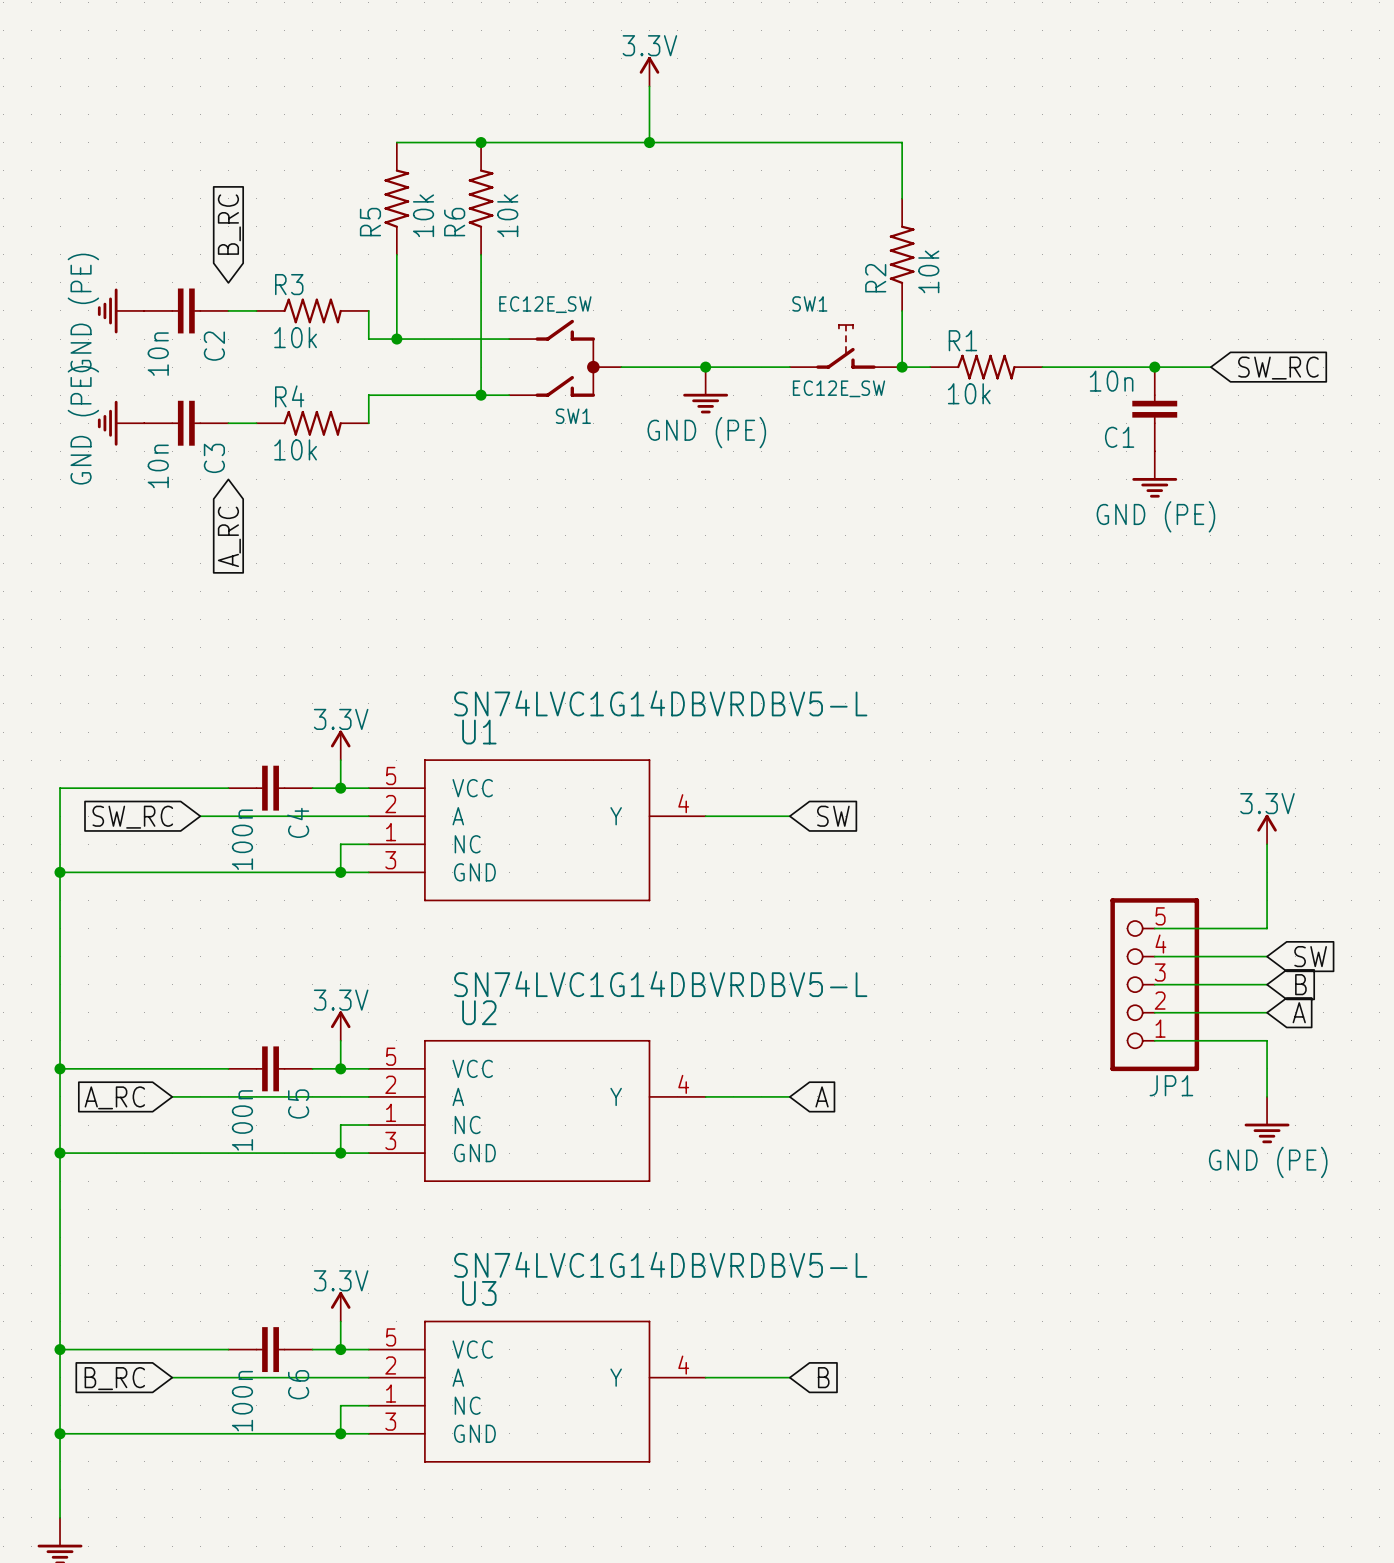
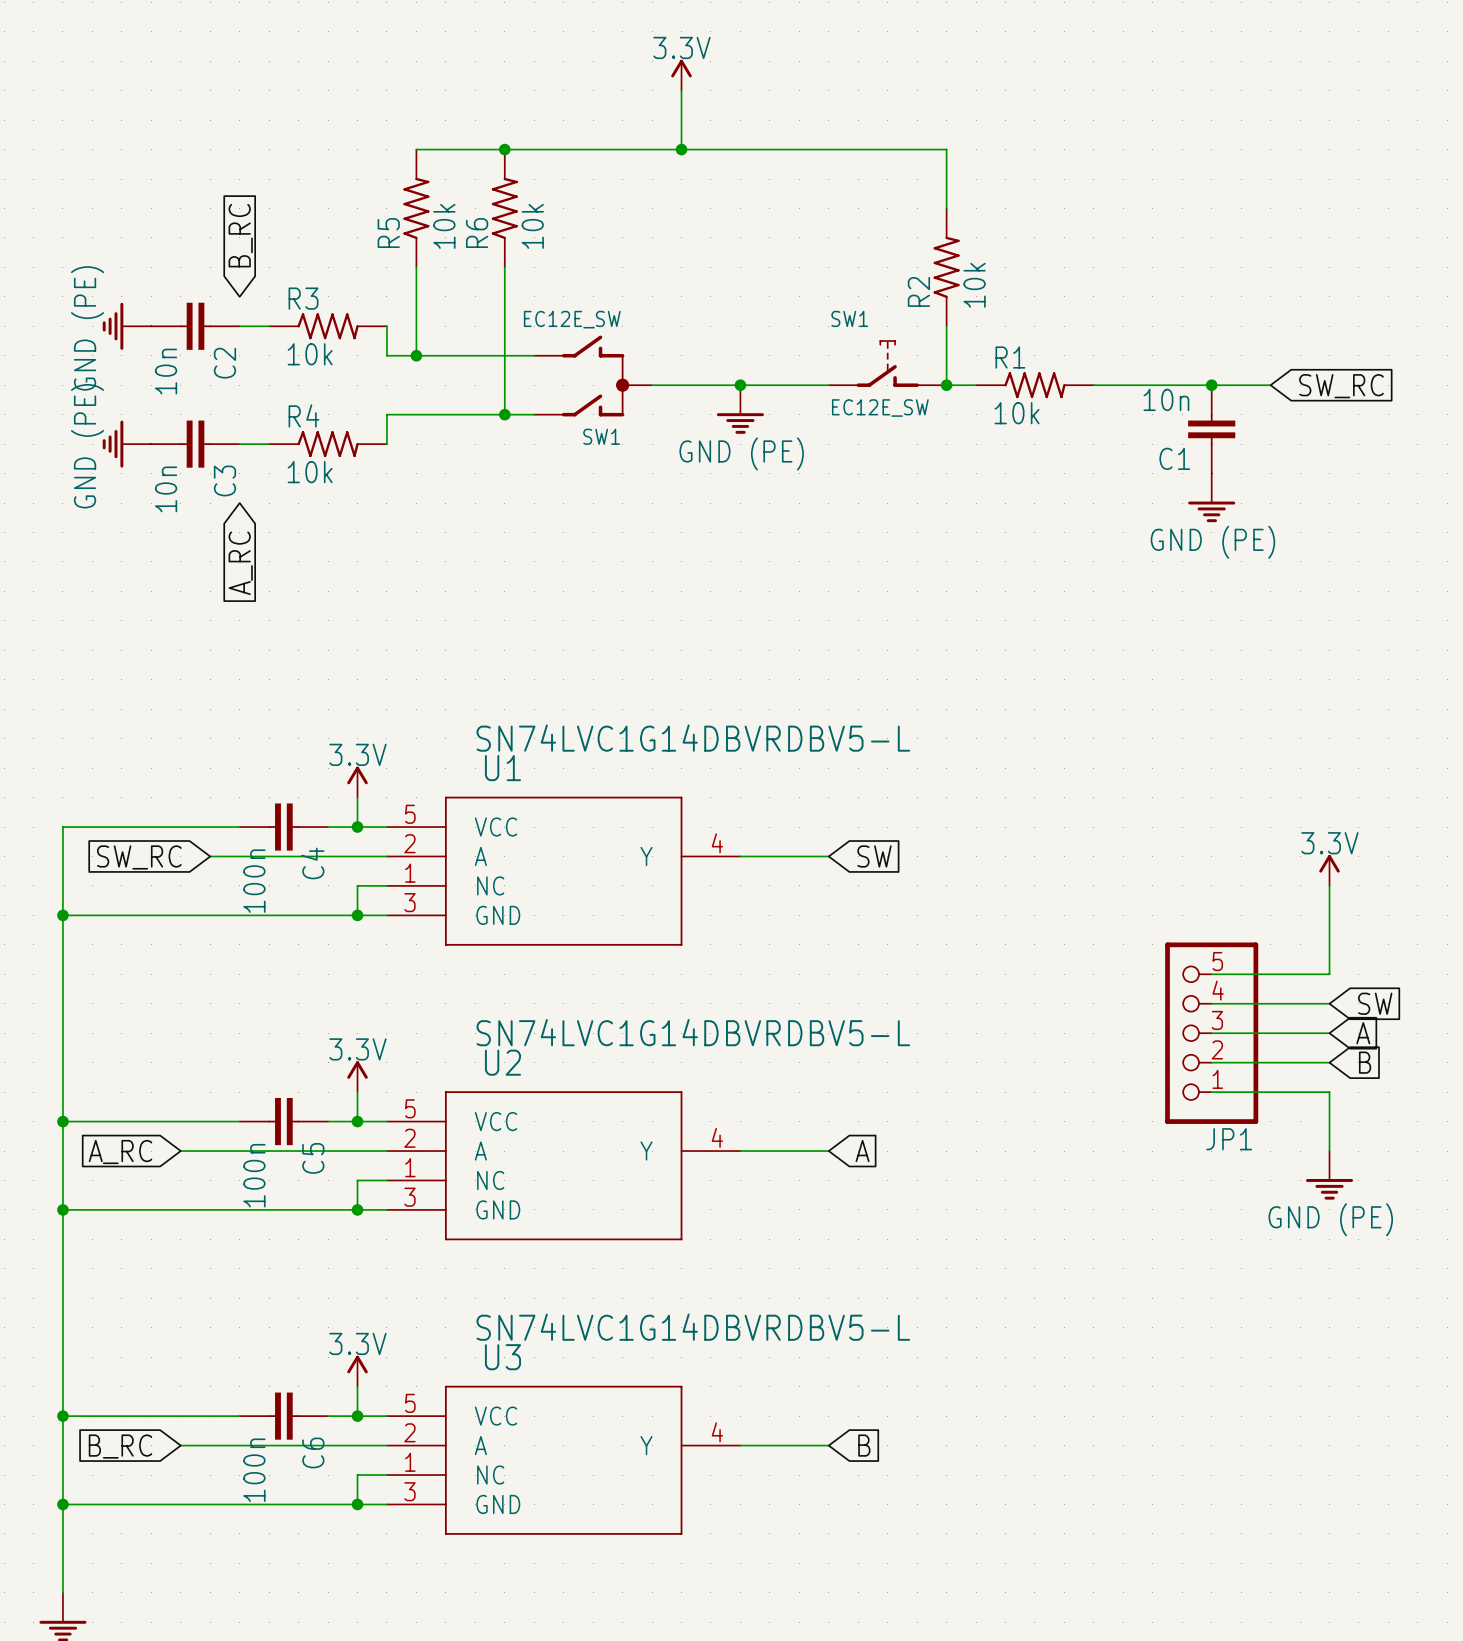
global label: B (1300, 984) -> A (1363, 1033)
global label: A (1299, 1012) -> B (1365, 1062)

